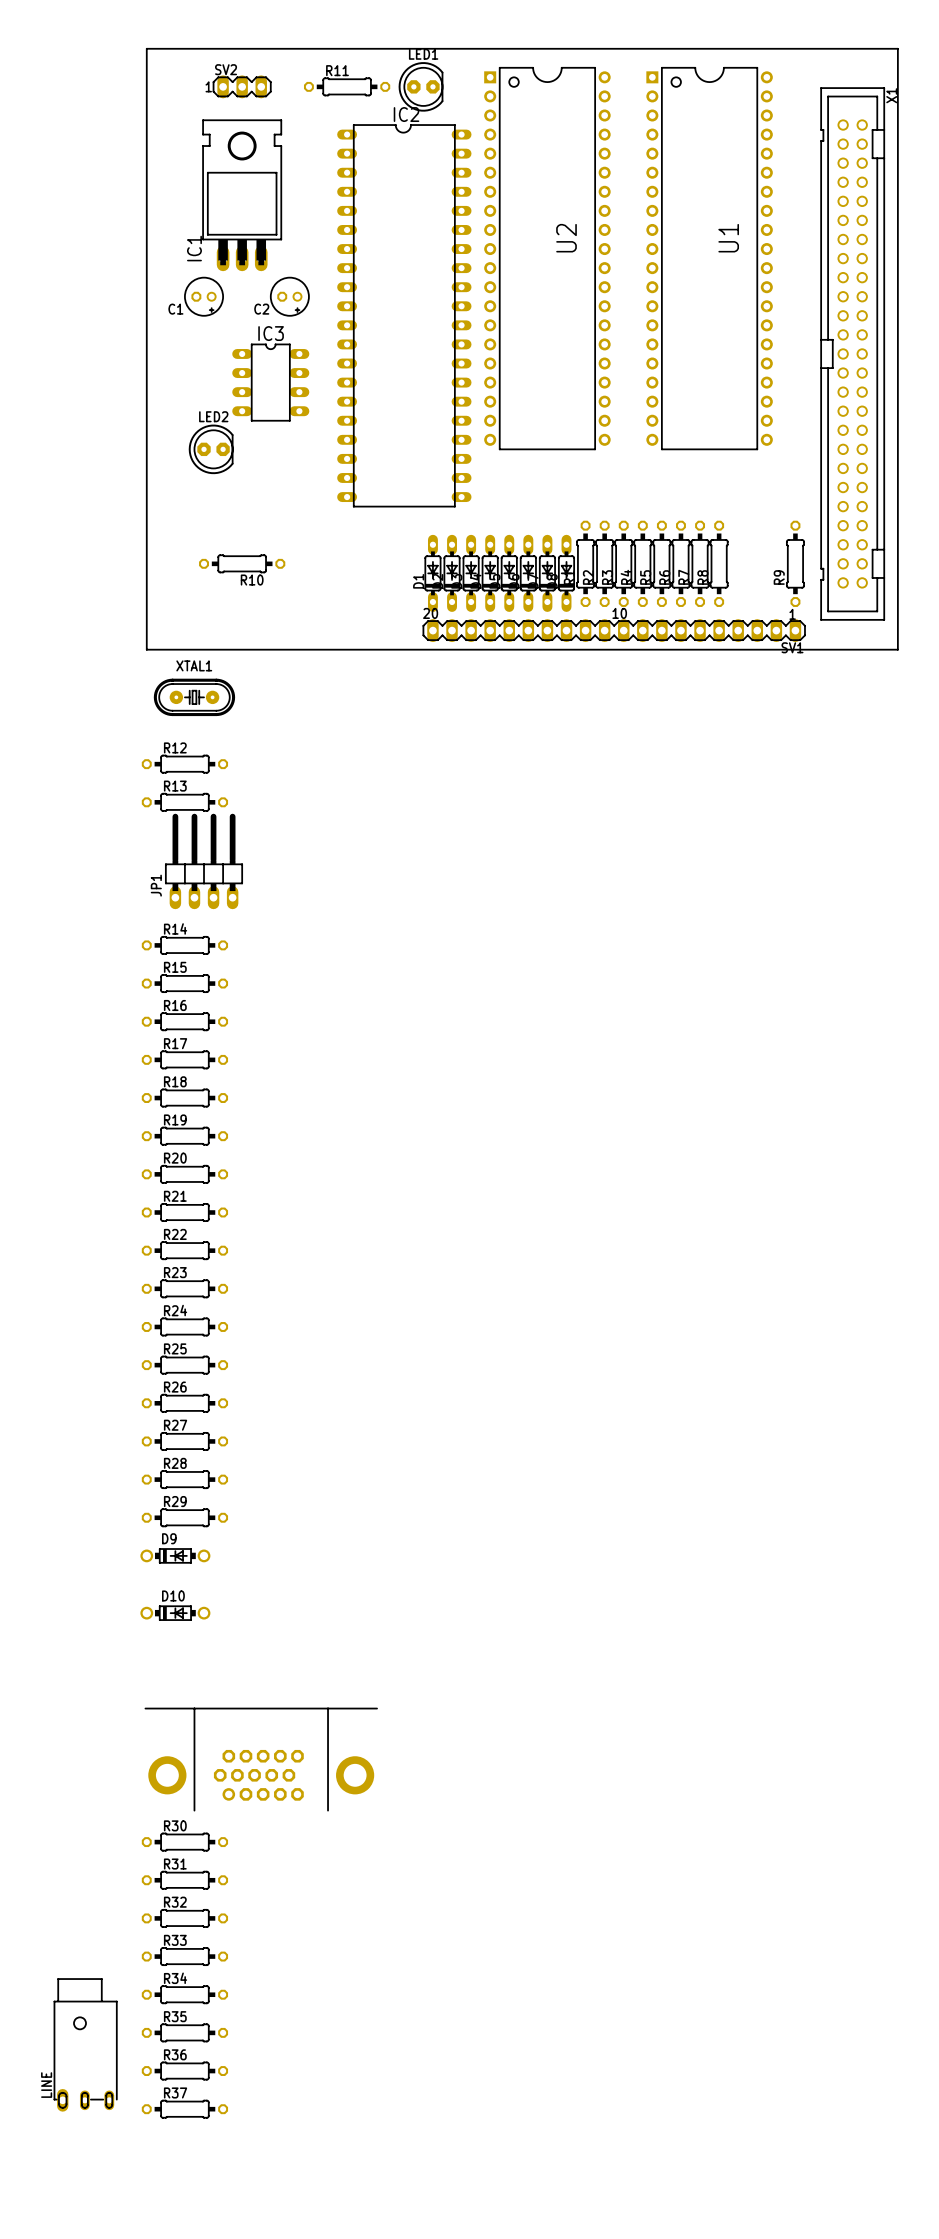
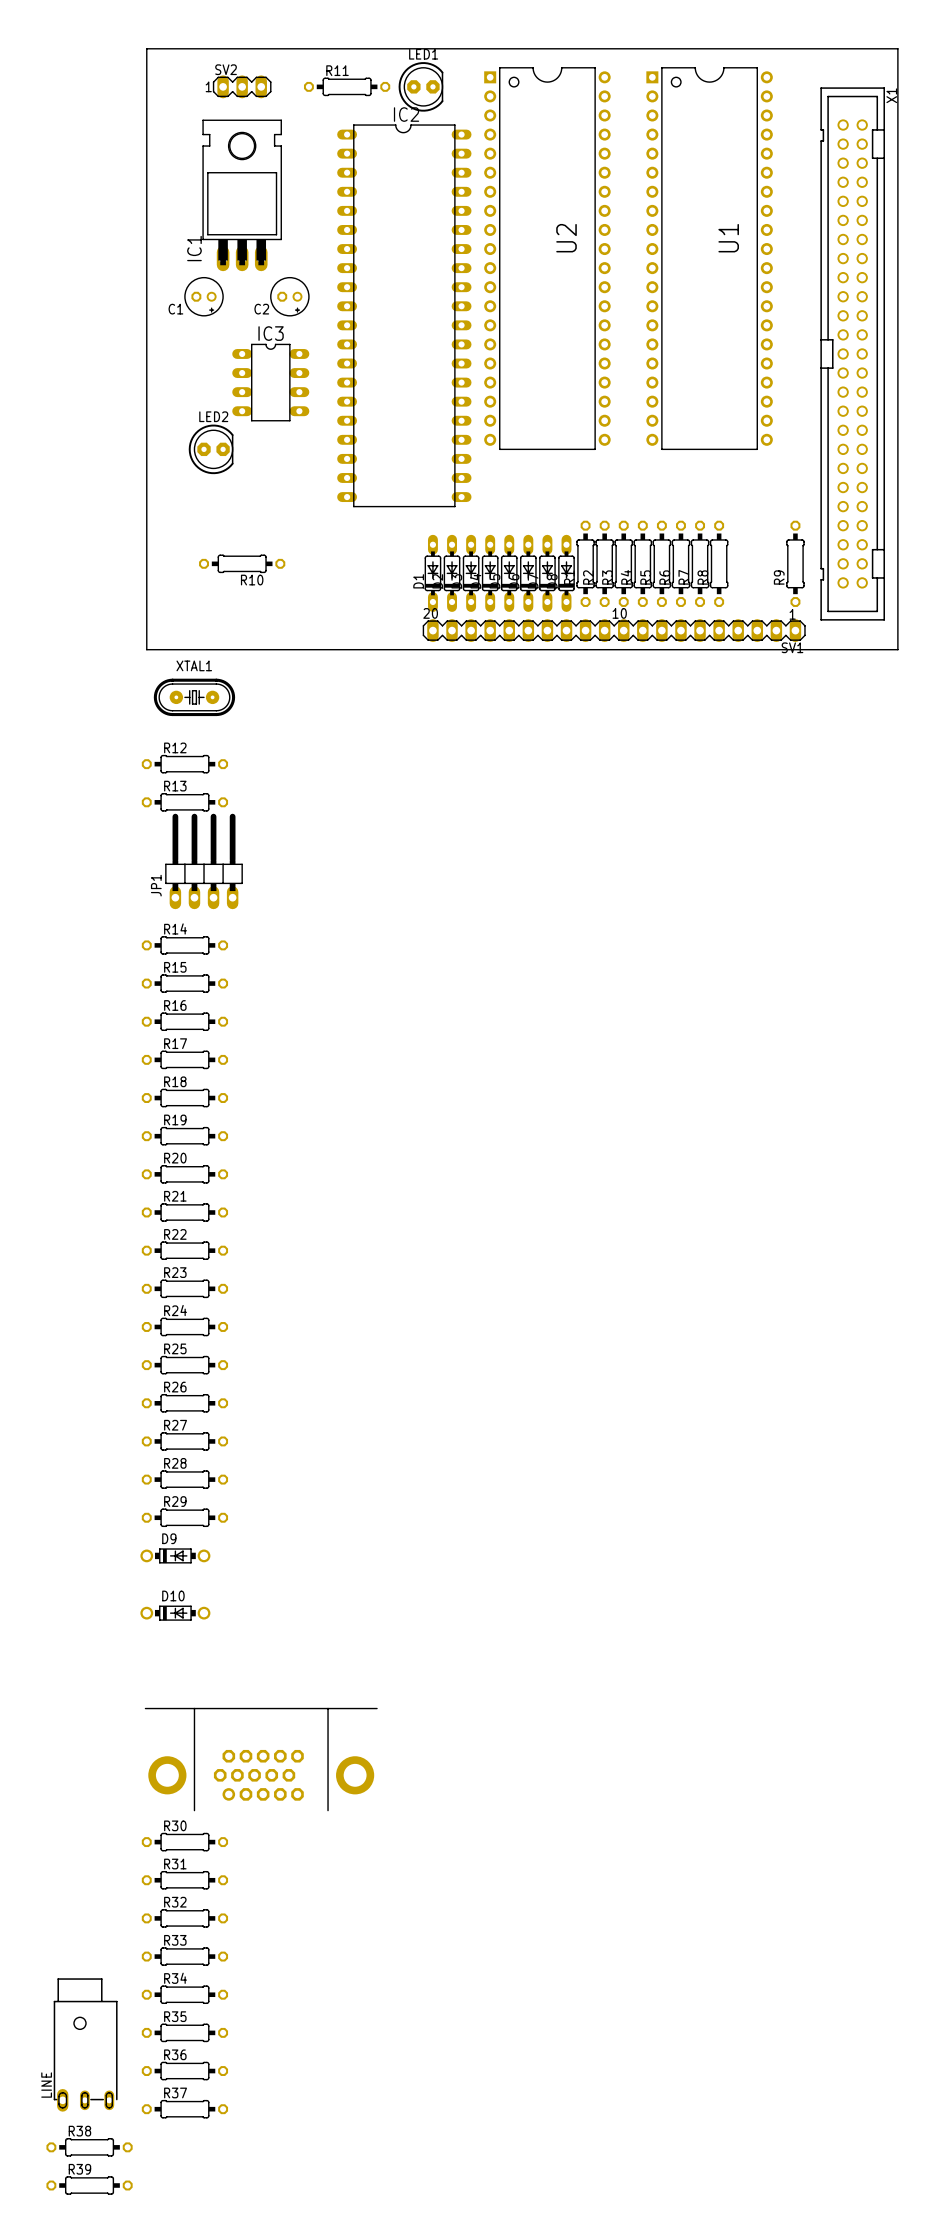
R38: none -> (89, 2147)
R39: none -> (89, 2185)

